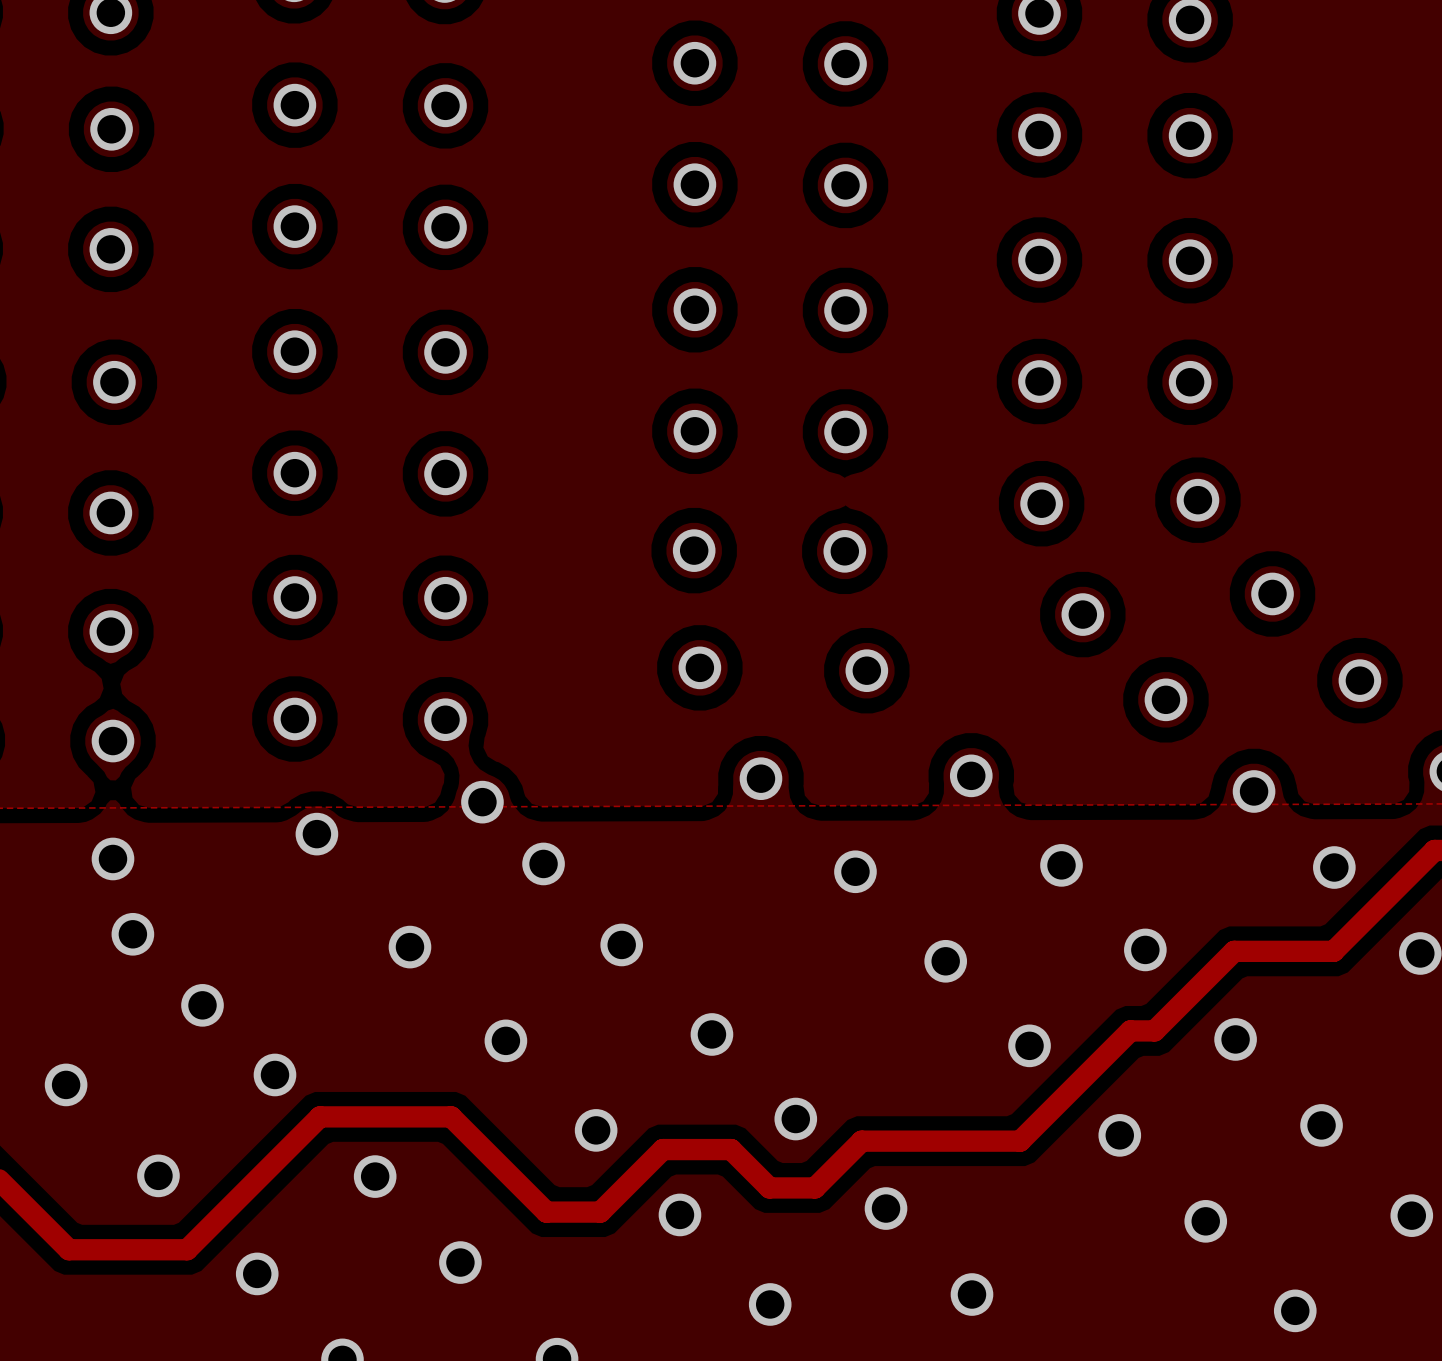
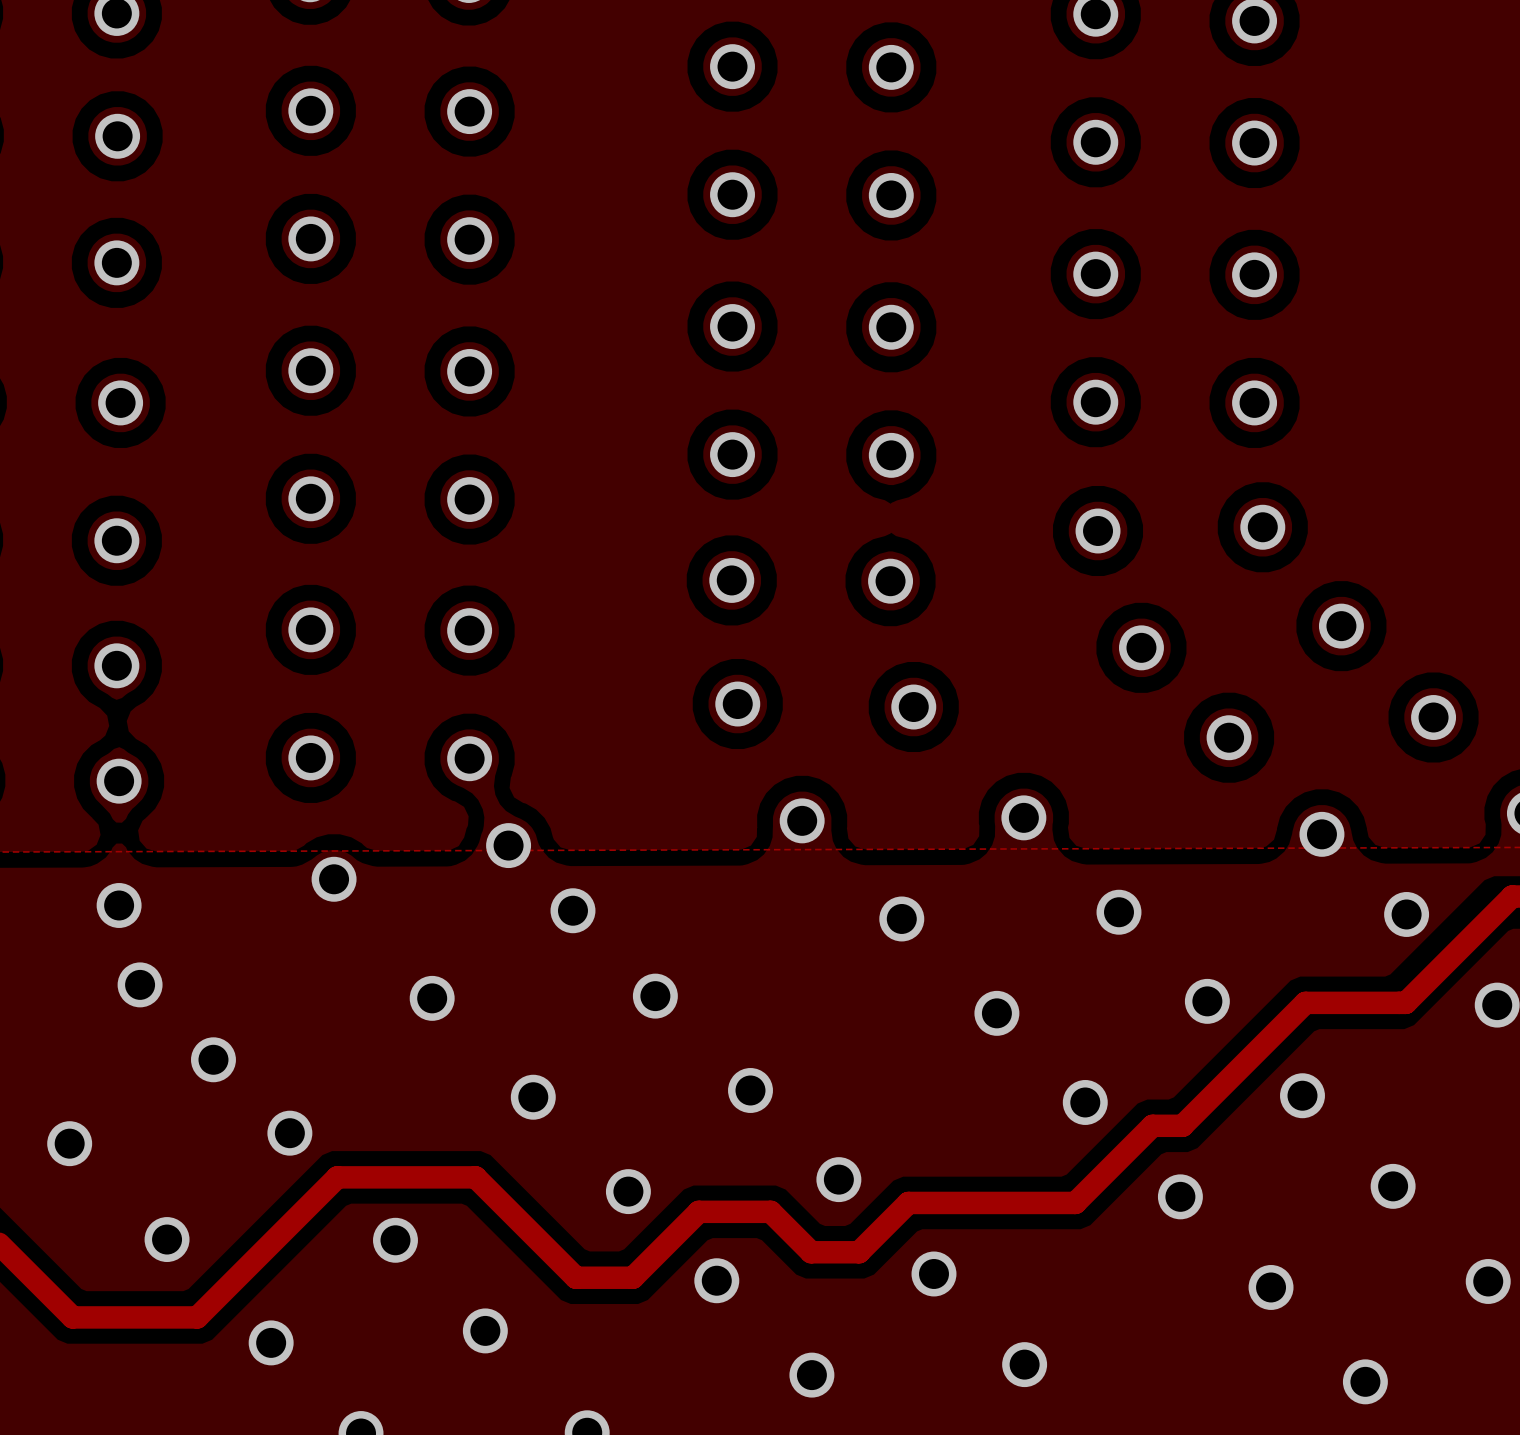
track: (1238, 951) (1234, 951) (1154, 1030) (1130, 1030) (1093, 1067) -> (1305, 1002) (1182, 1125) (1152, 1125)

